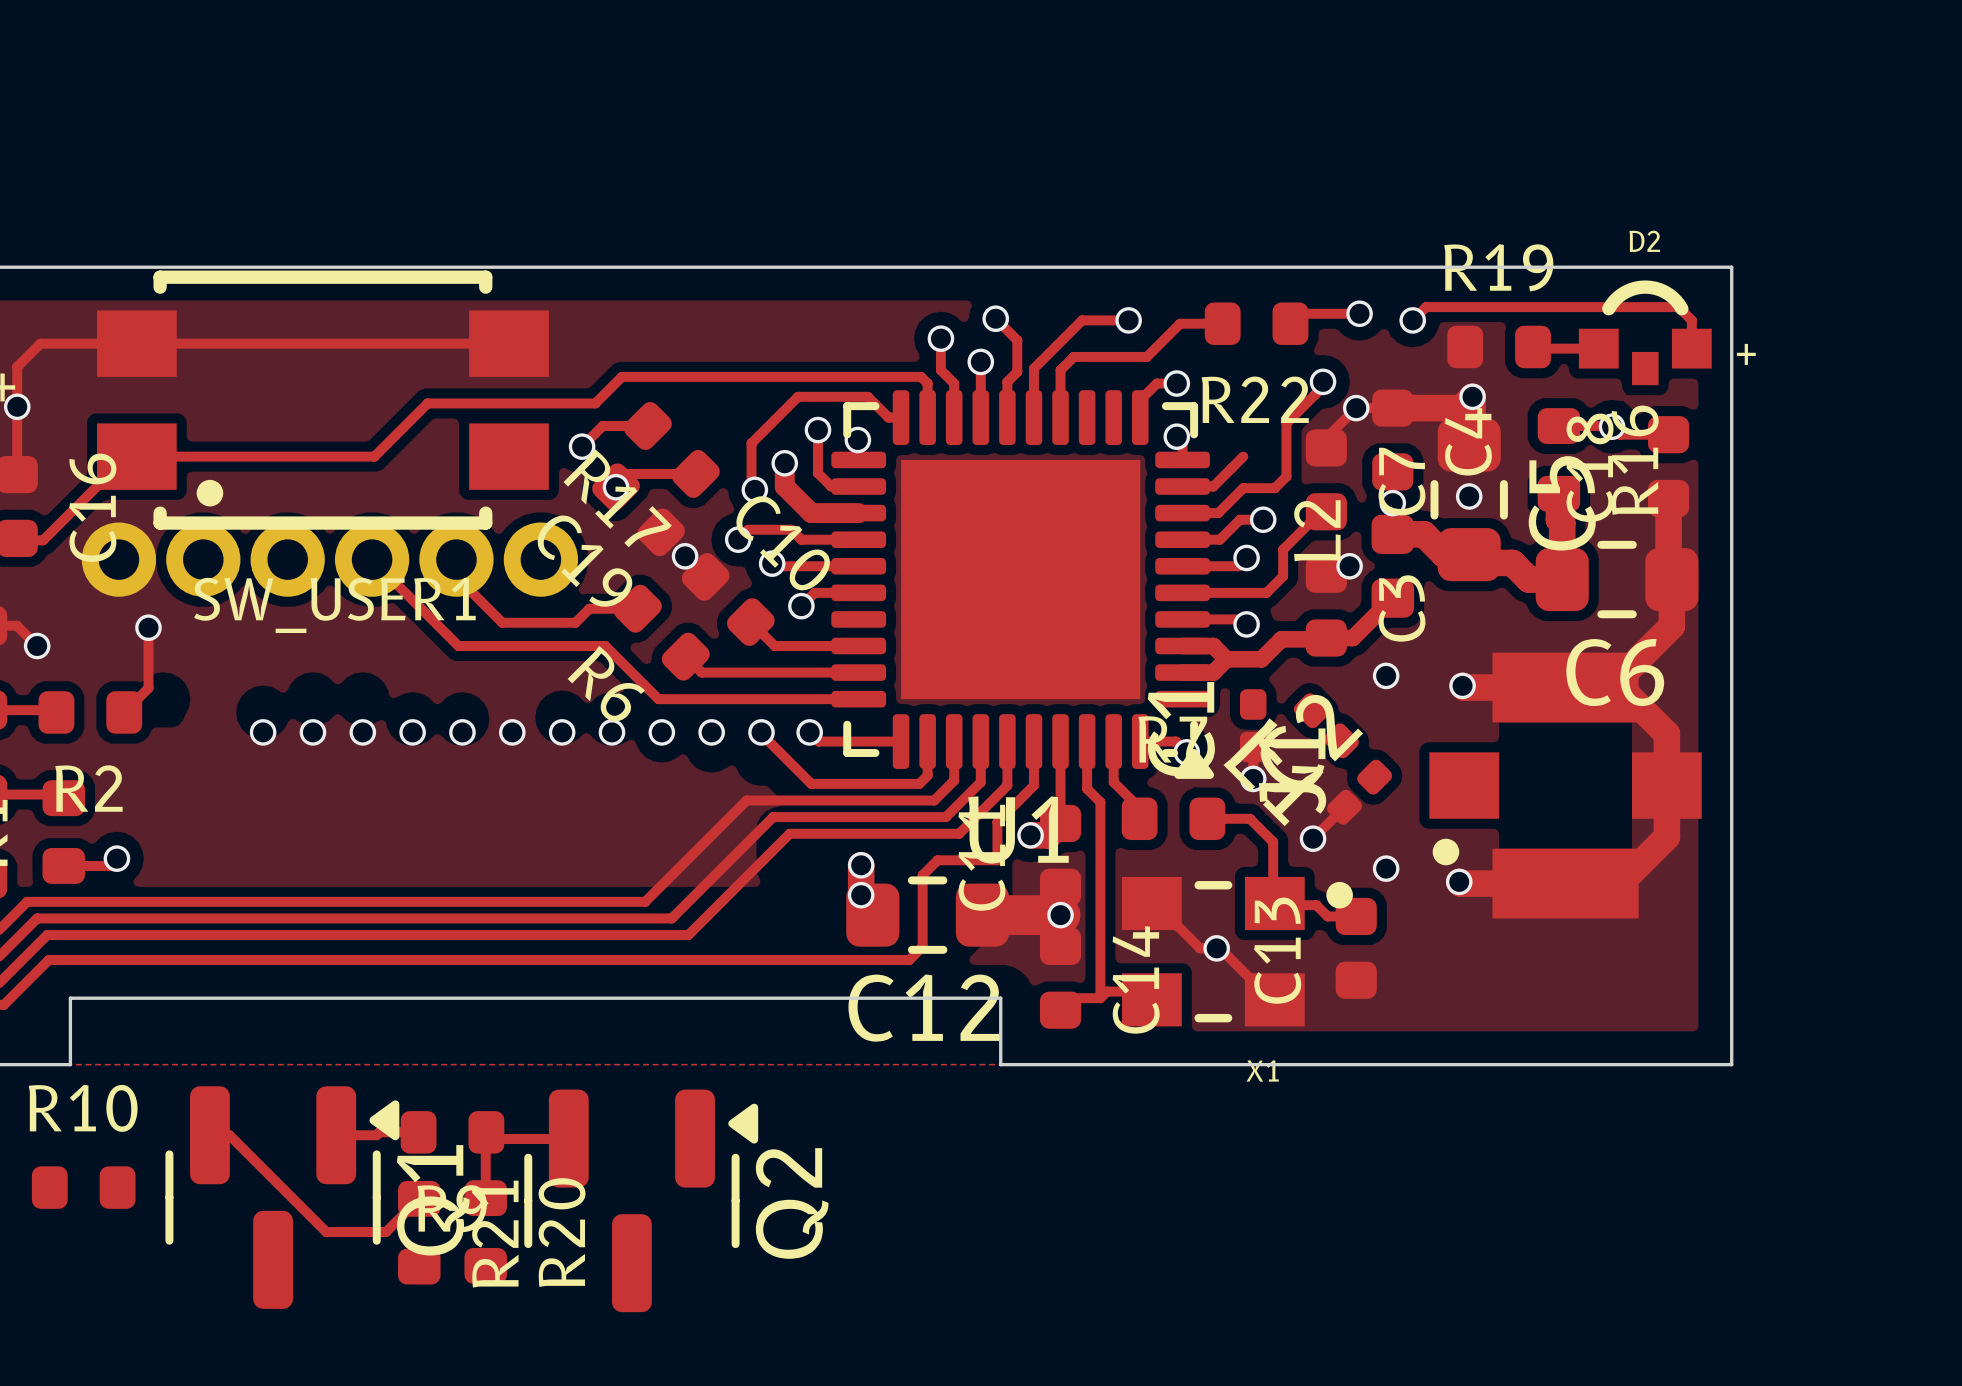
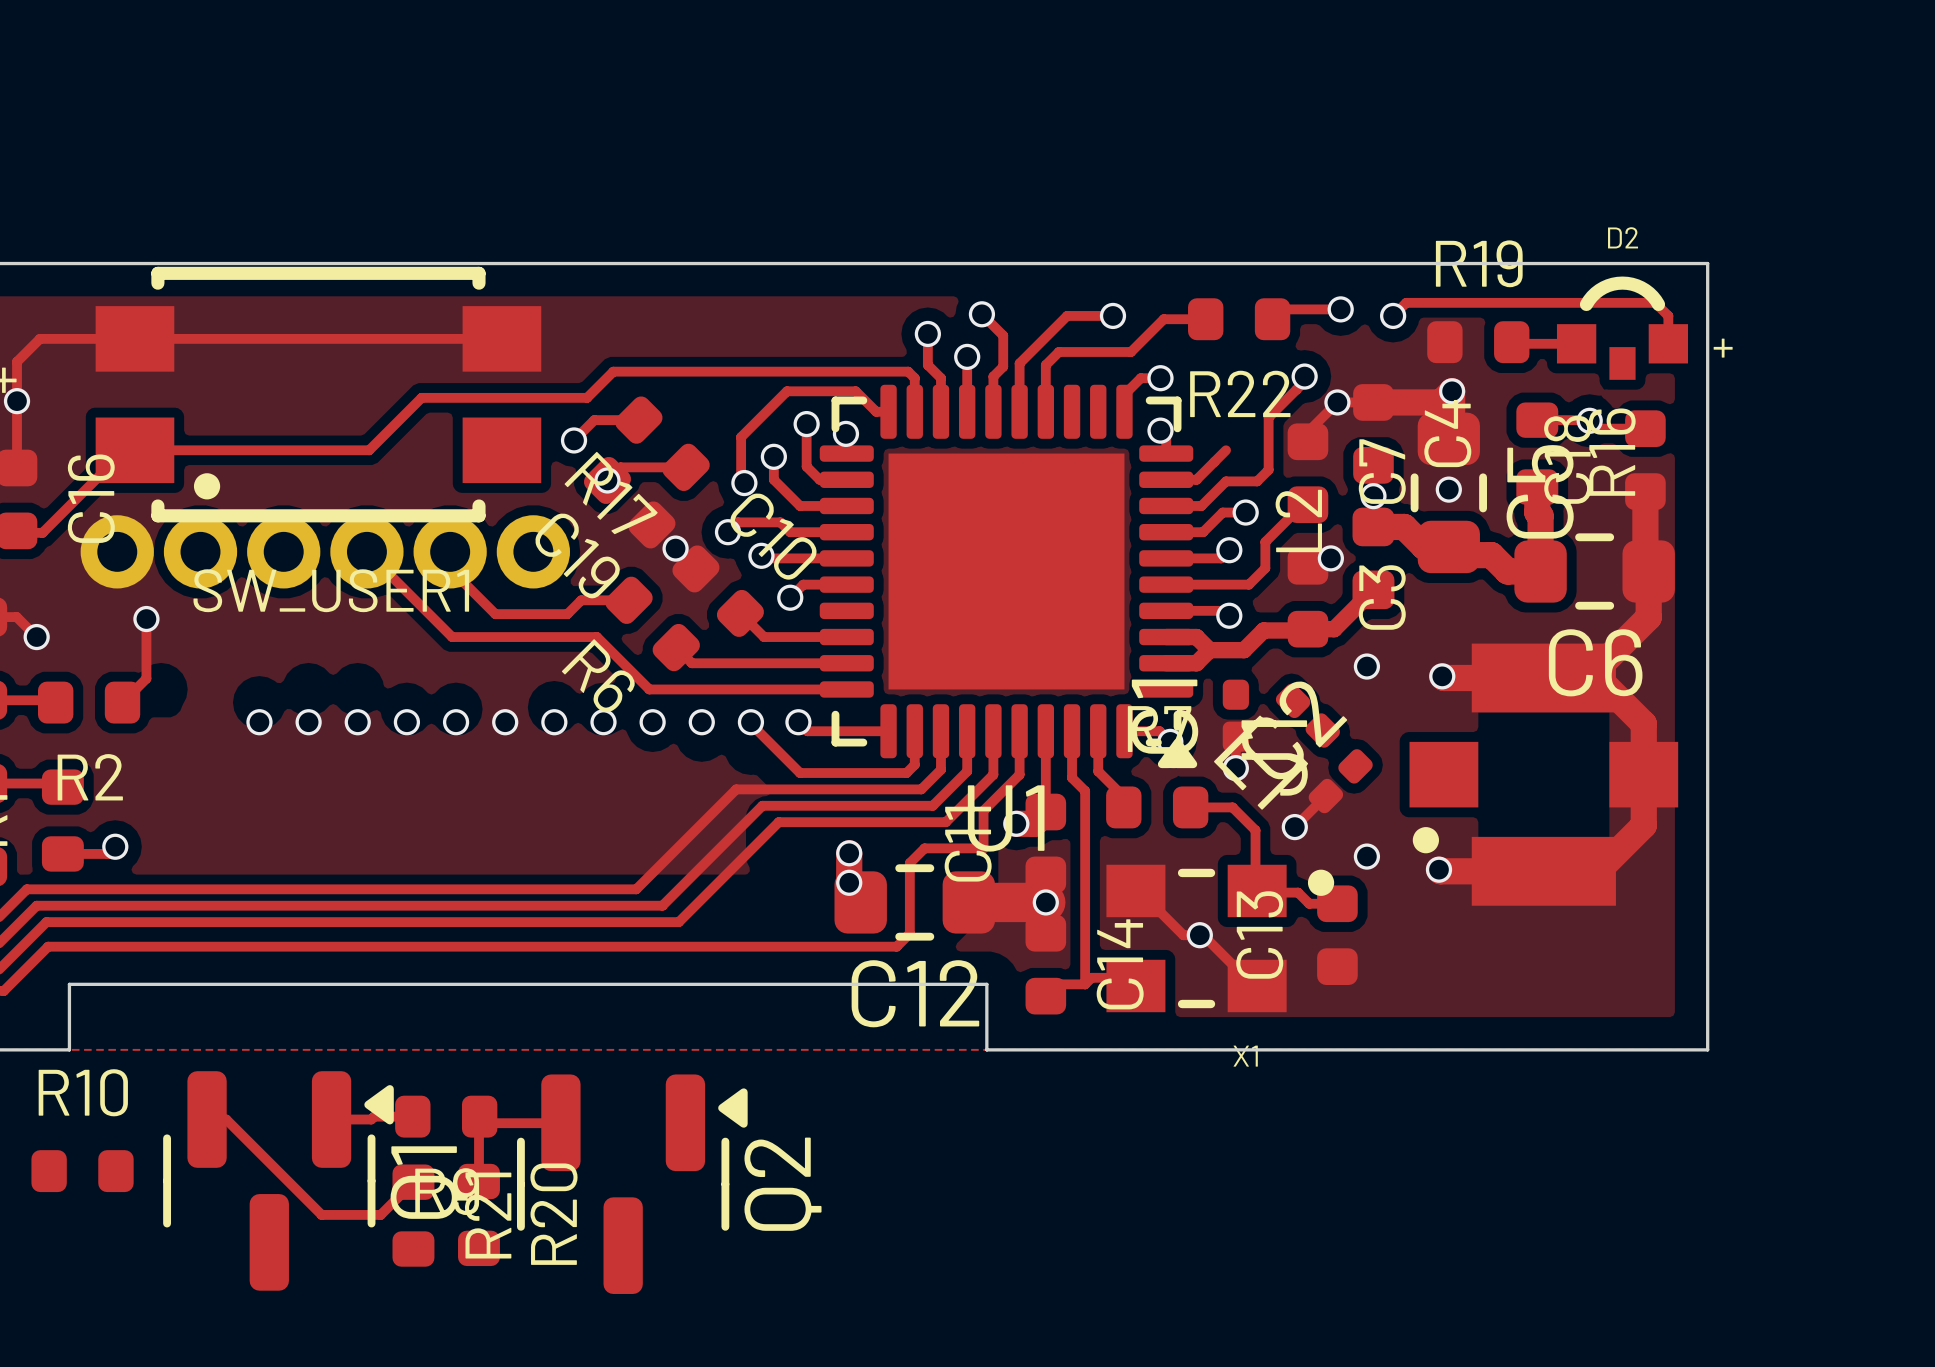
track width: thick (784, 463) (784, 486) (811, 513) (858, 513) -> thin (773, 456) (773, 479) (800, 505) (846, 505)

